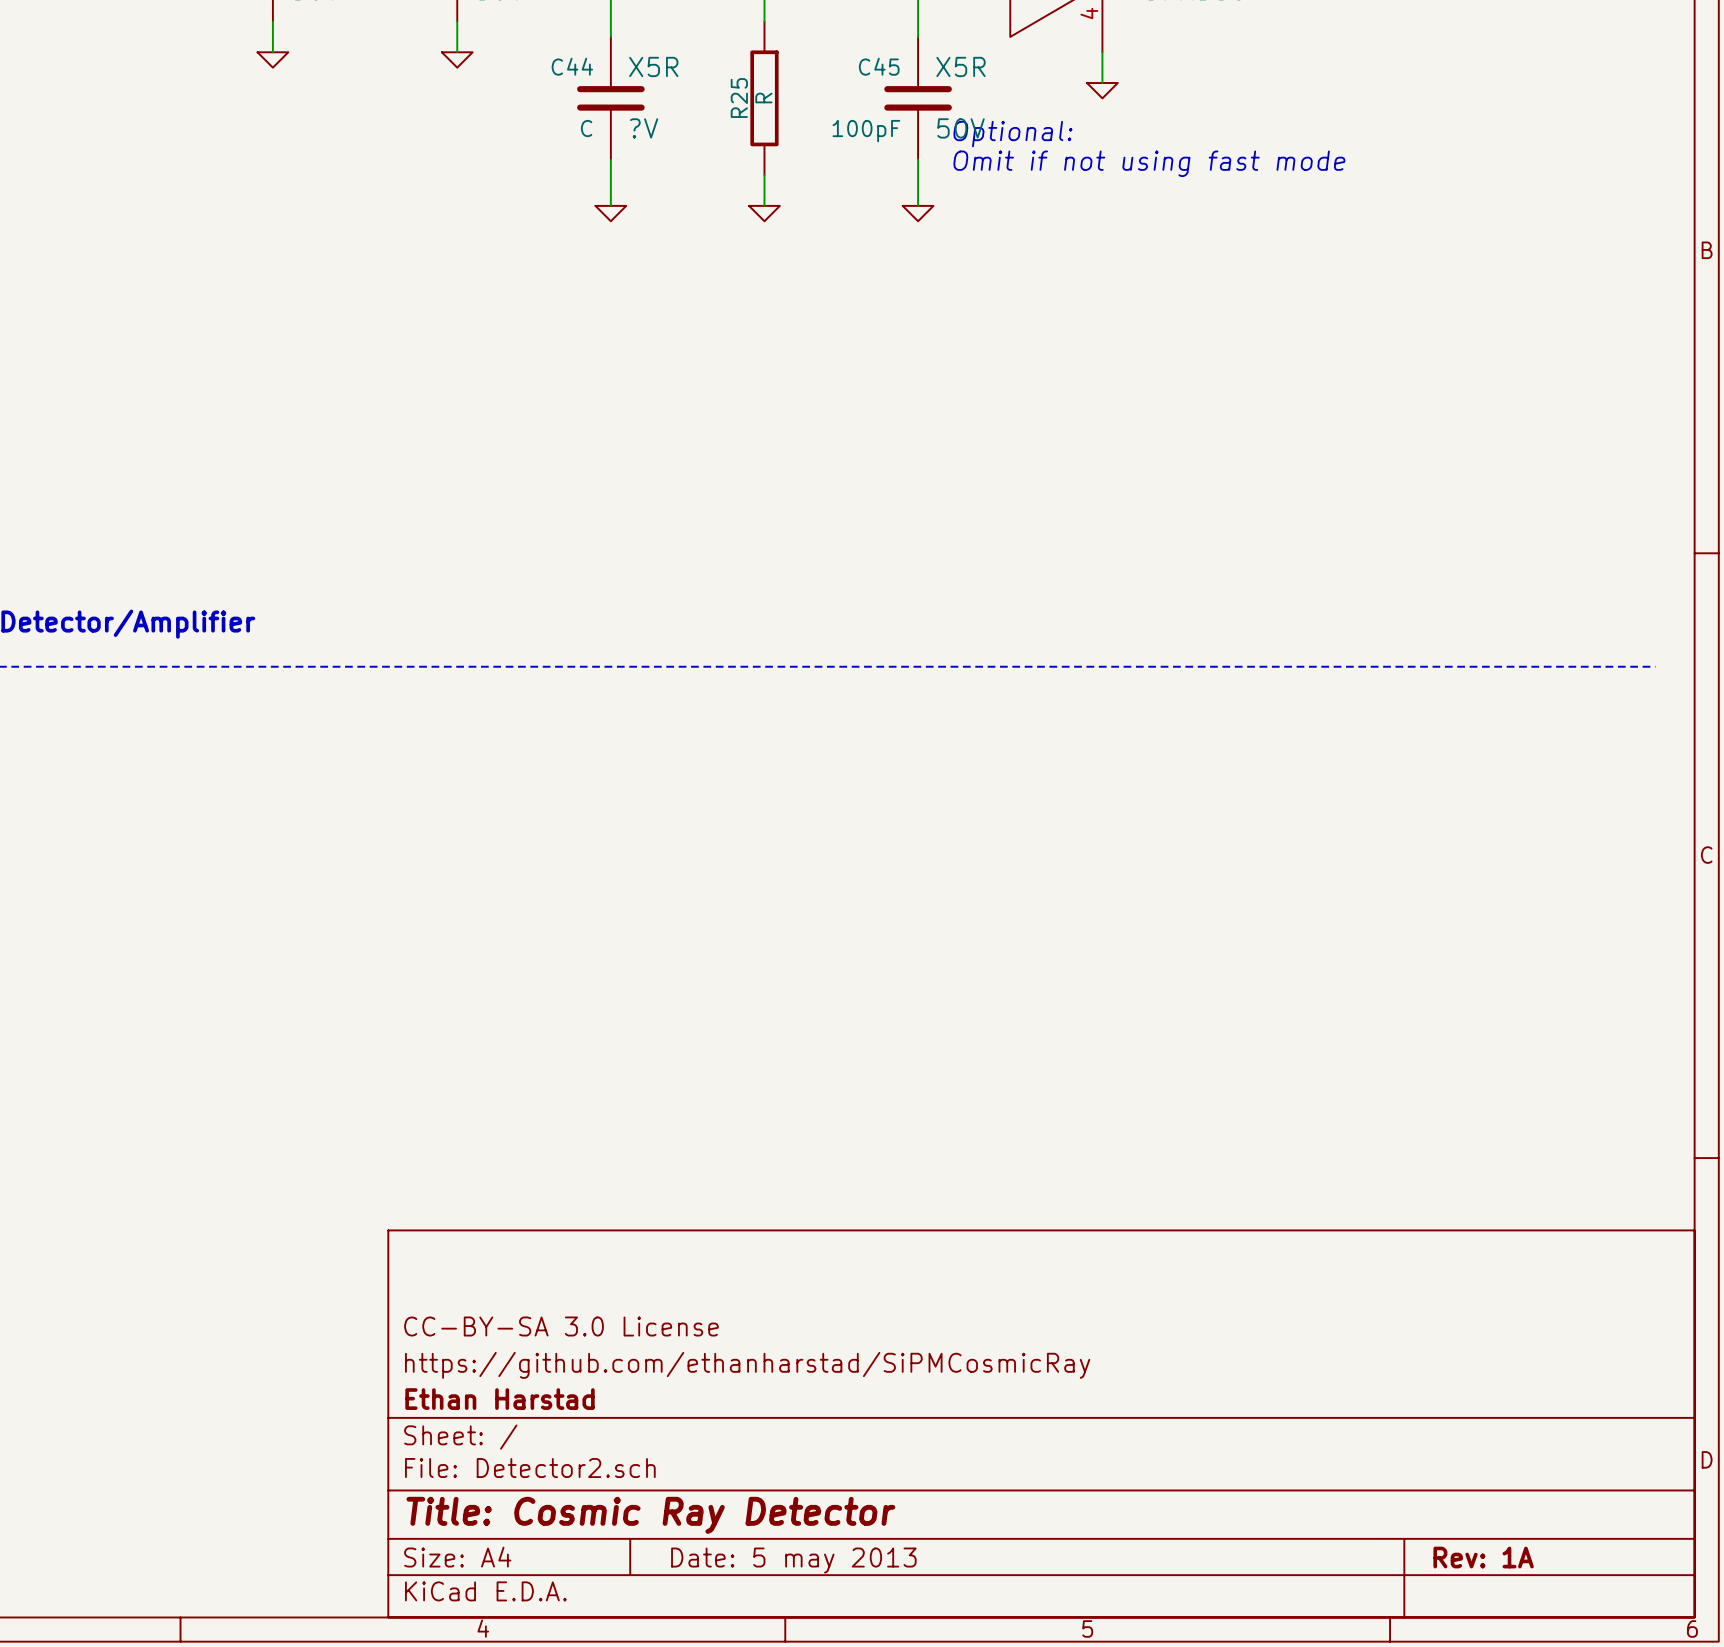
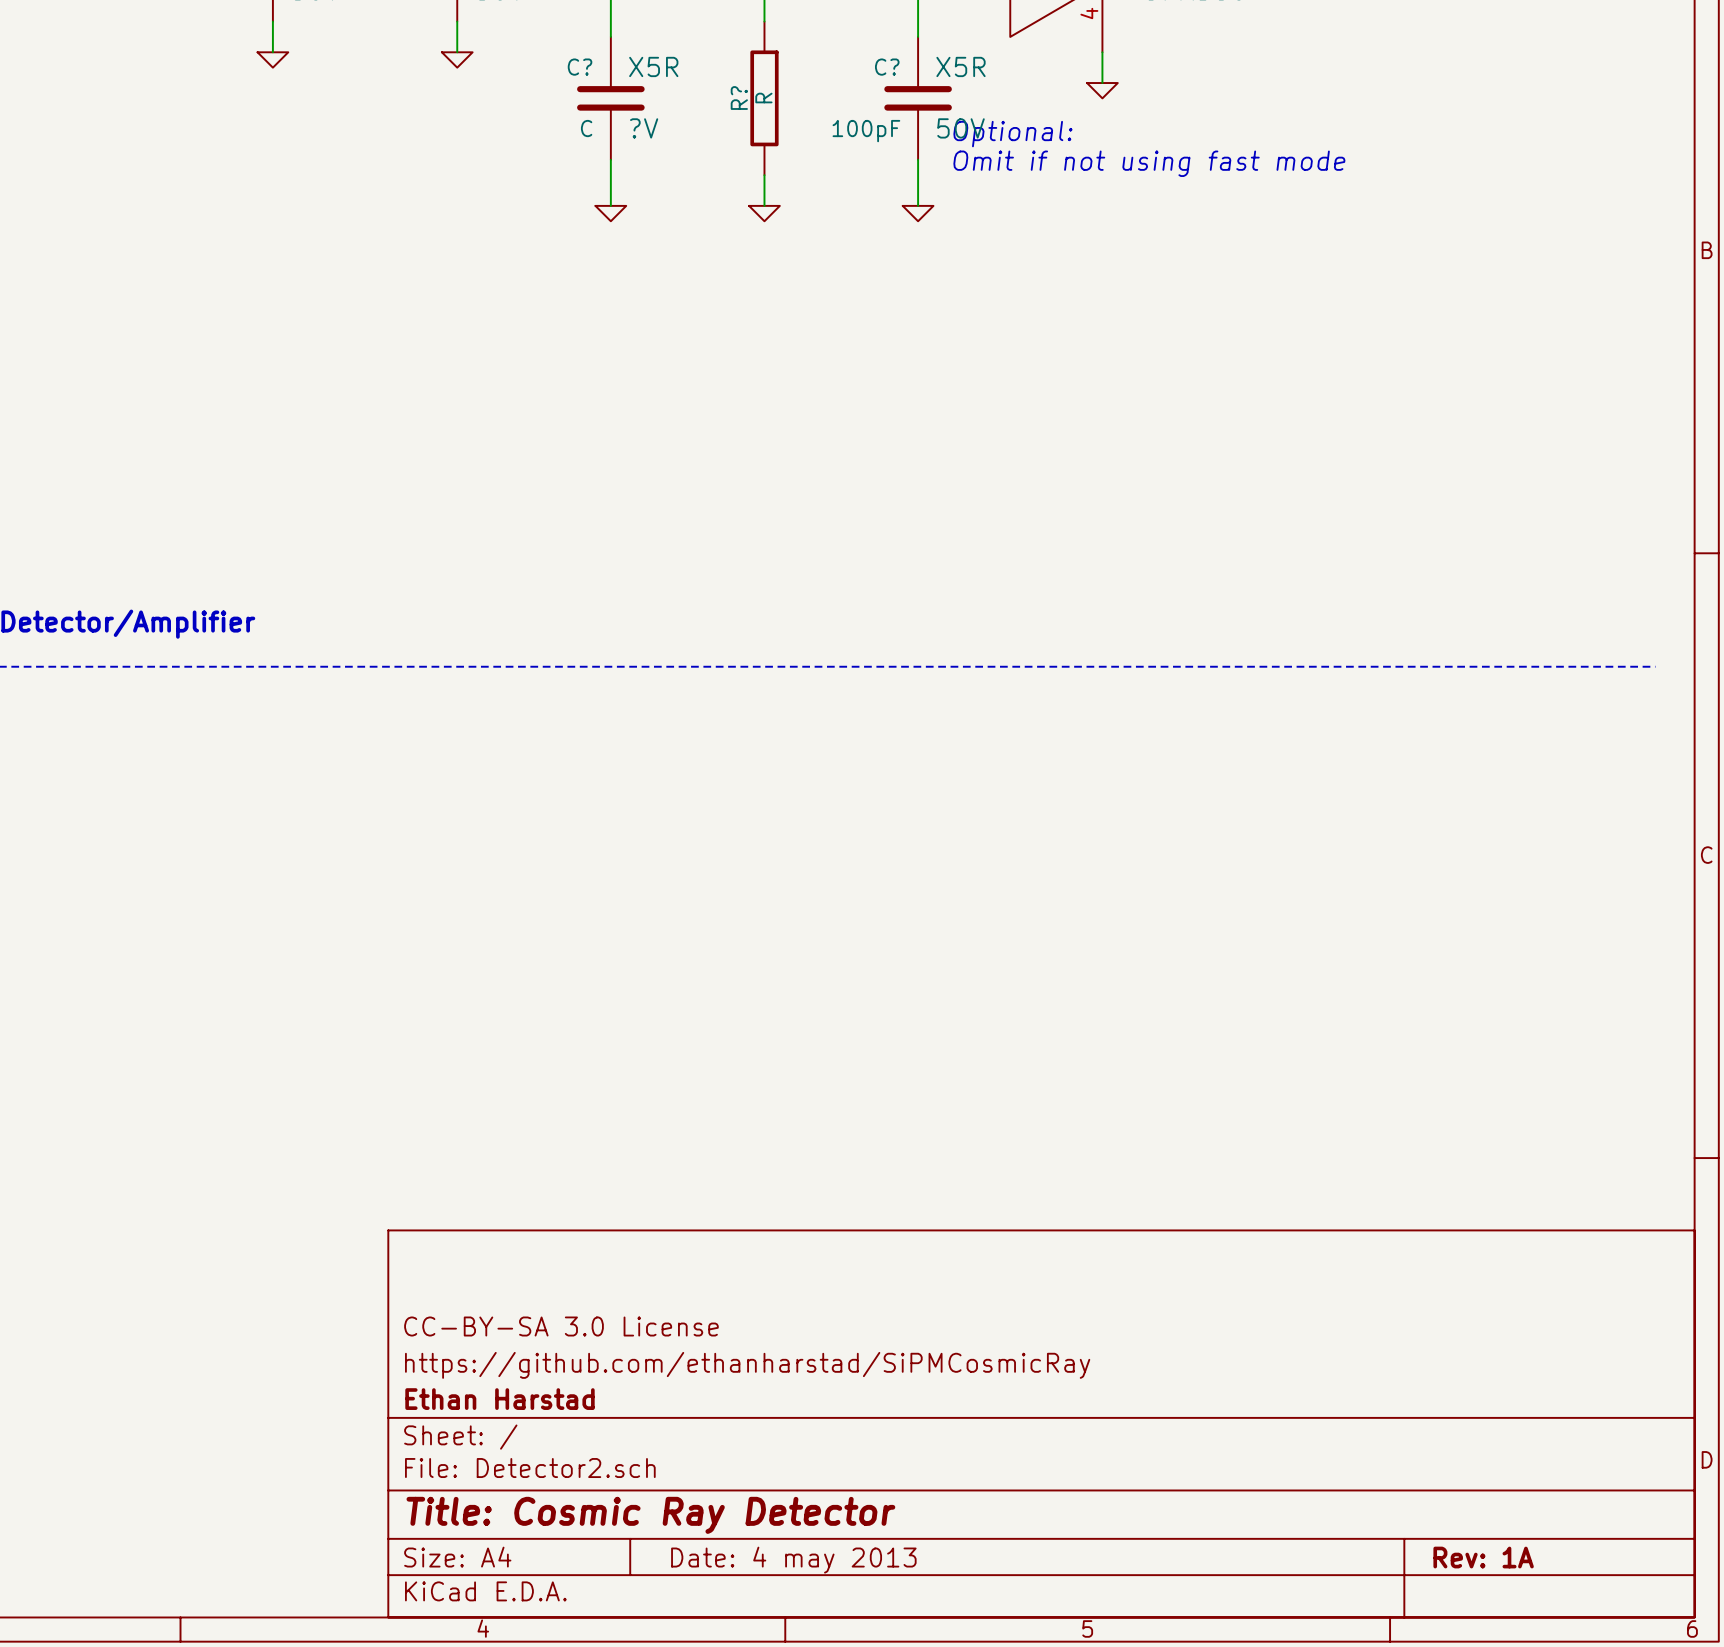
C44 name: C44 (572, 66) -> C? (580, 67)
C45 name: C45 (879, 66) -> C? (887, 67)
R25 name: R25 (739, 98) -> R? (739, 98)
title block: Date: 5 may 2013 (793, 1560) -> Date: 4 may 2013 (793, 1560)

